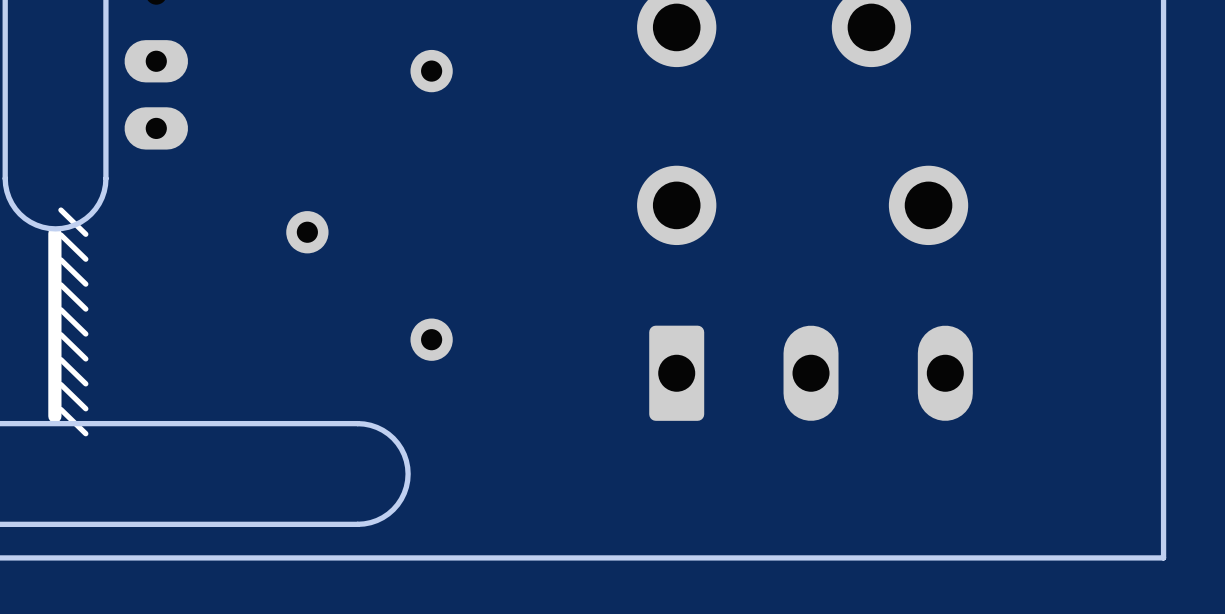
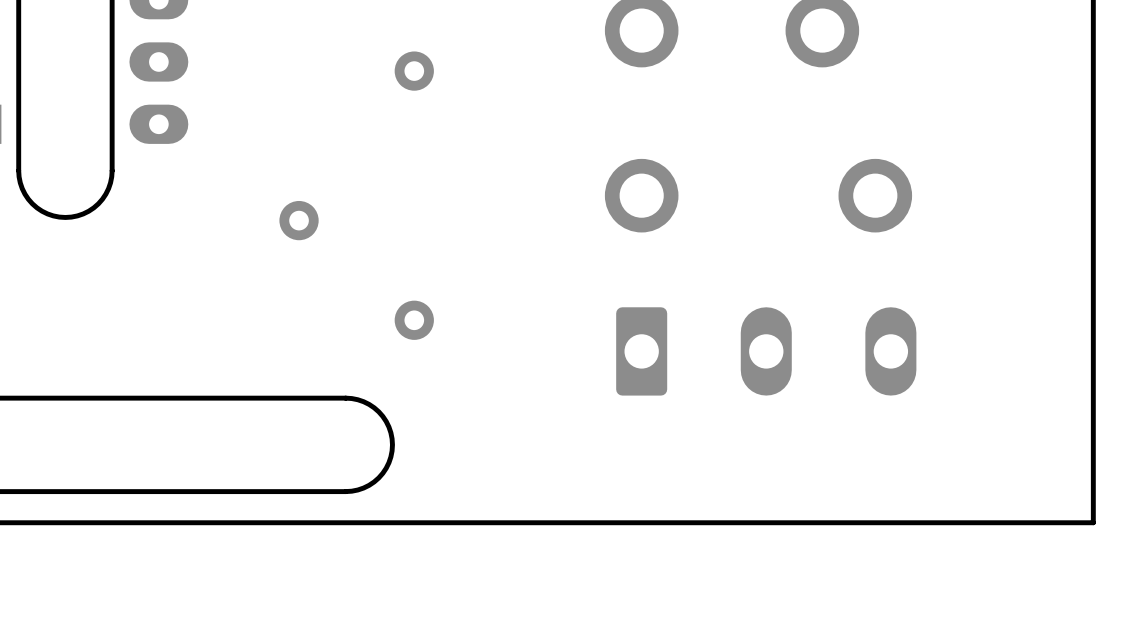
line: (60, 210) (85, 234) -> none
line: (54, 233) (54, 416) -> none
line: (60, 235) (85, 259) -> none
line: (60, 259) (85, 284) -> none
line: (60, 284) (85, 309) -> none
line: (60, 309) (85, 333) -> none
line: (60, 334) (85, 358) -> none
line: (60, 359) (85, 383) -> none
line: (60, 384) (85, 408) -> none
line: (60, 409) (85, 433) -> none

